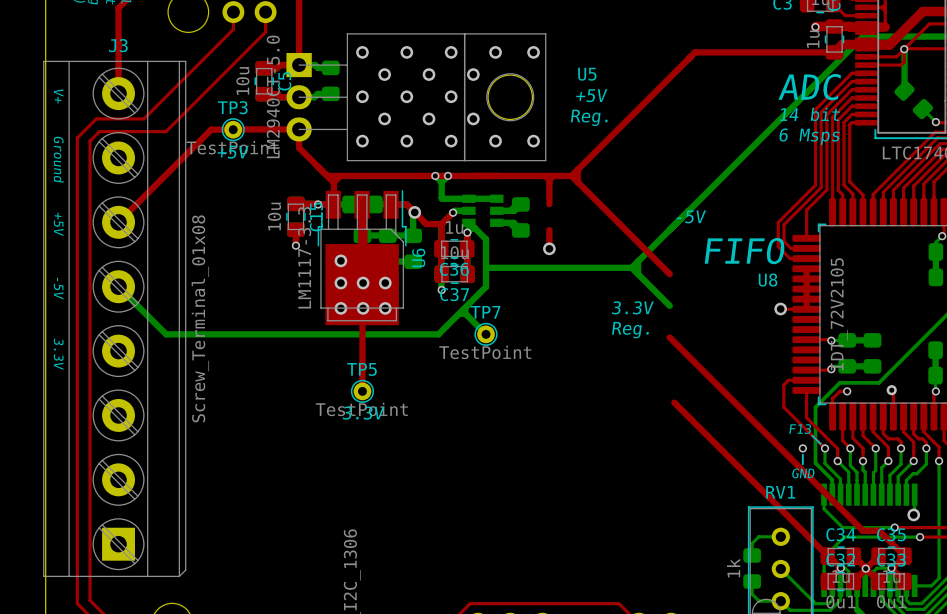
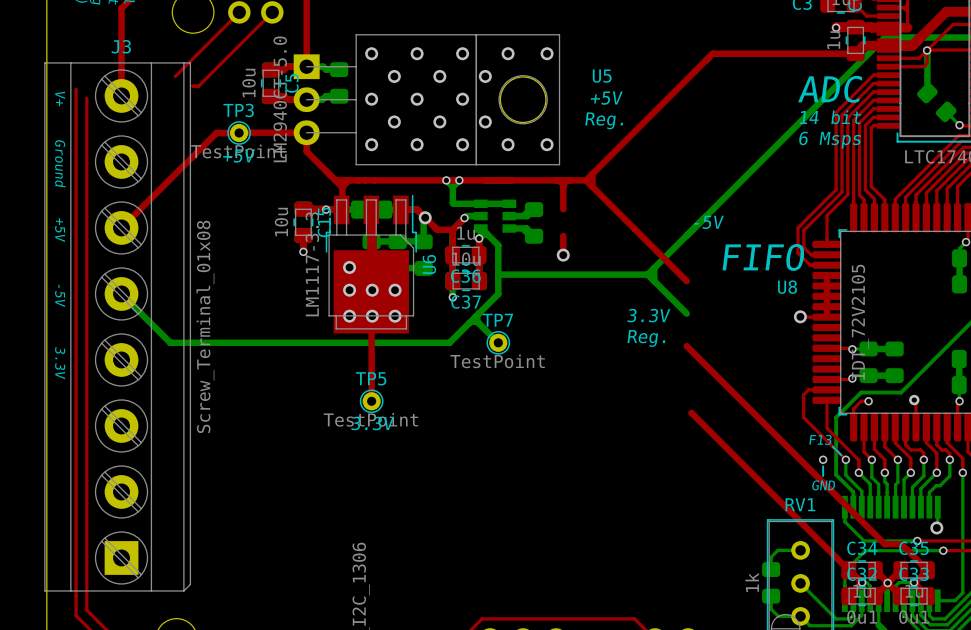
top track: (233, 12) (233, 29) (143, 118) (96, 118) (77, 137) (77, 603) -> (76, 89) (76, 615) (79, 618)
top track: none -> (239, 12) (175, 76)
top track: (265, 12) (265, 32) (166, 131) (99, 131) (90, 141) (90, 600) -> (86, 98) (86, 610) (92, 615)
top track: none -> (272, 12) (198, 86) (192, 86)

